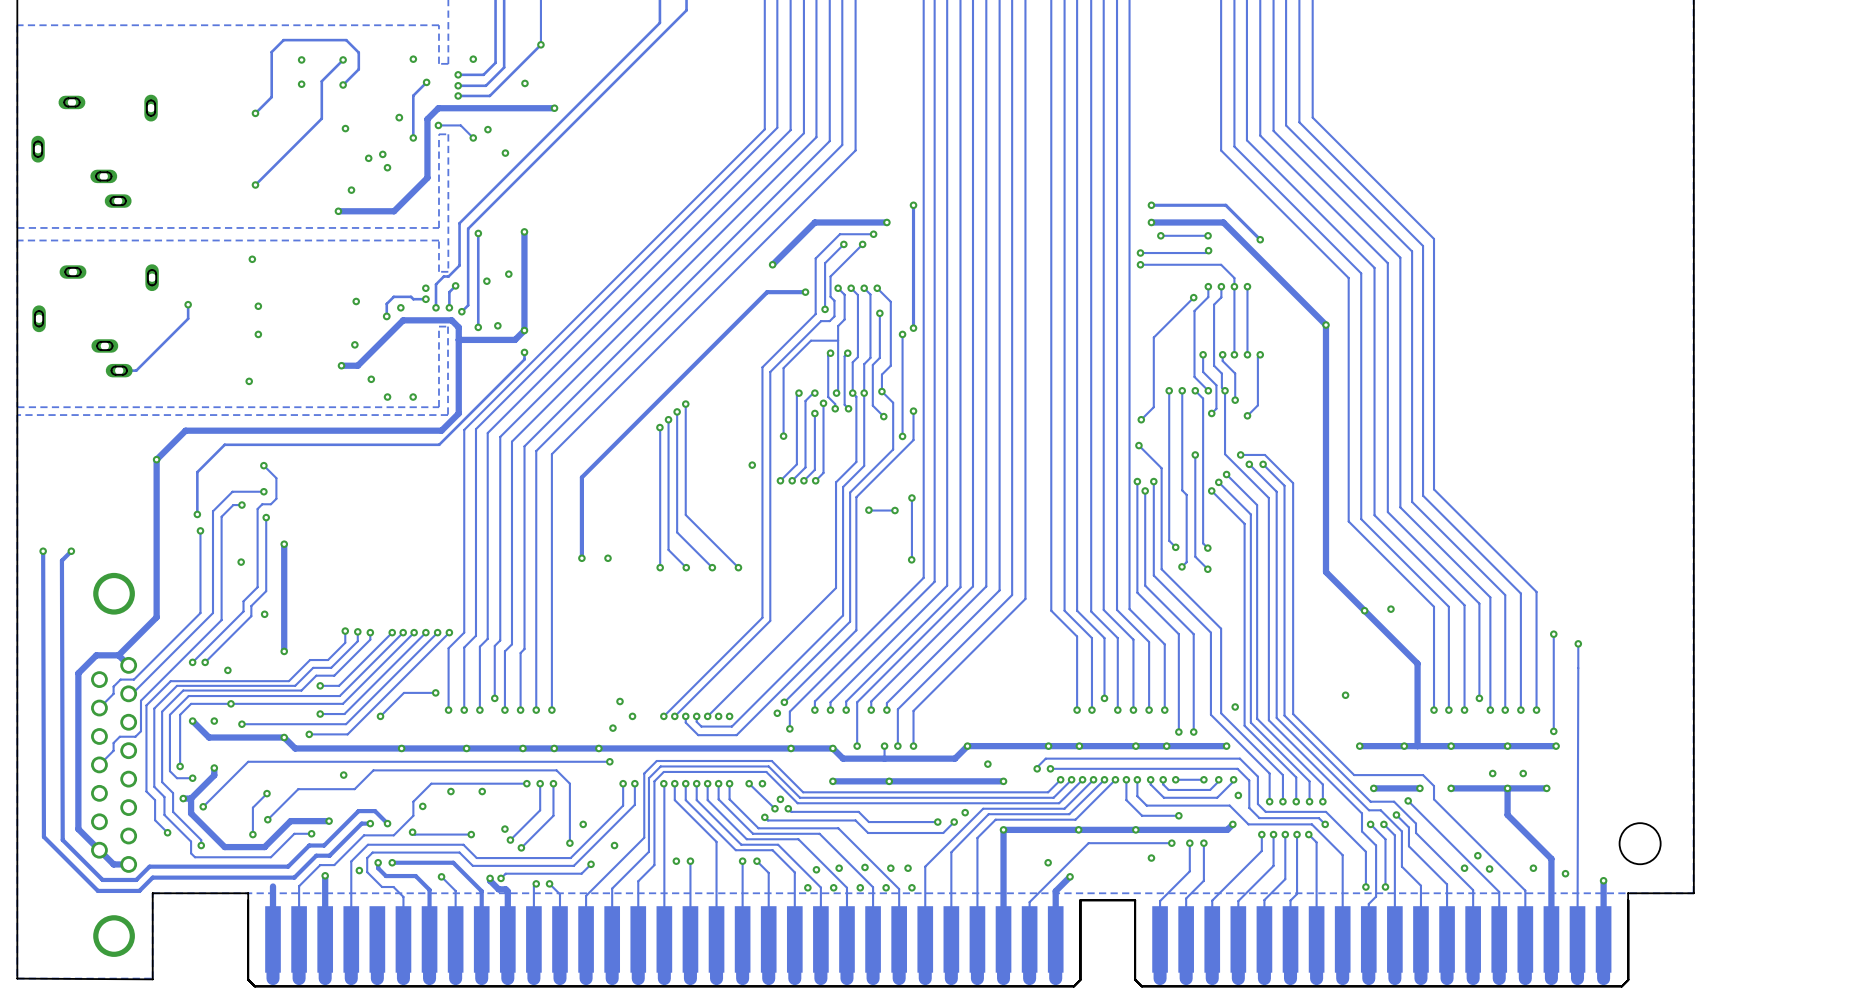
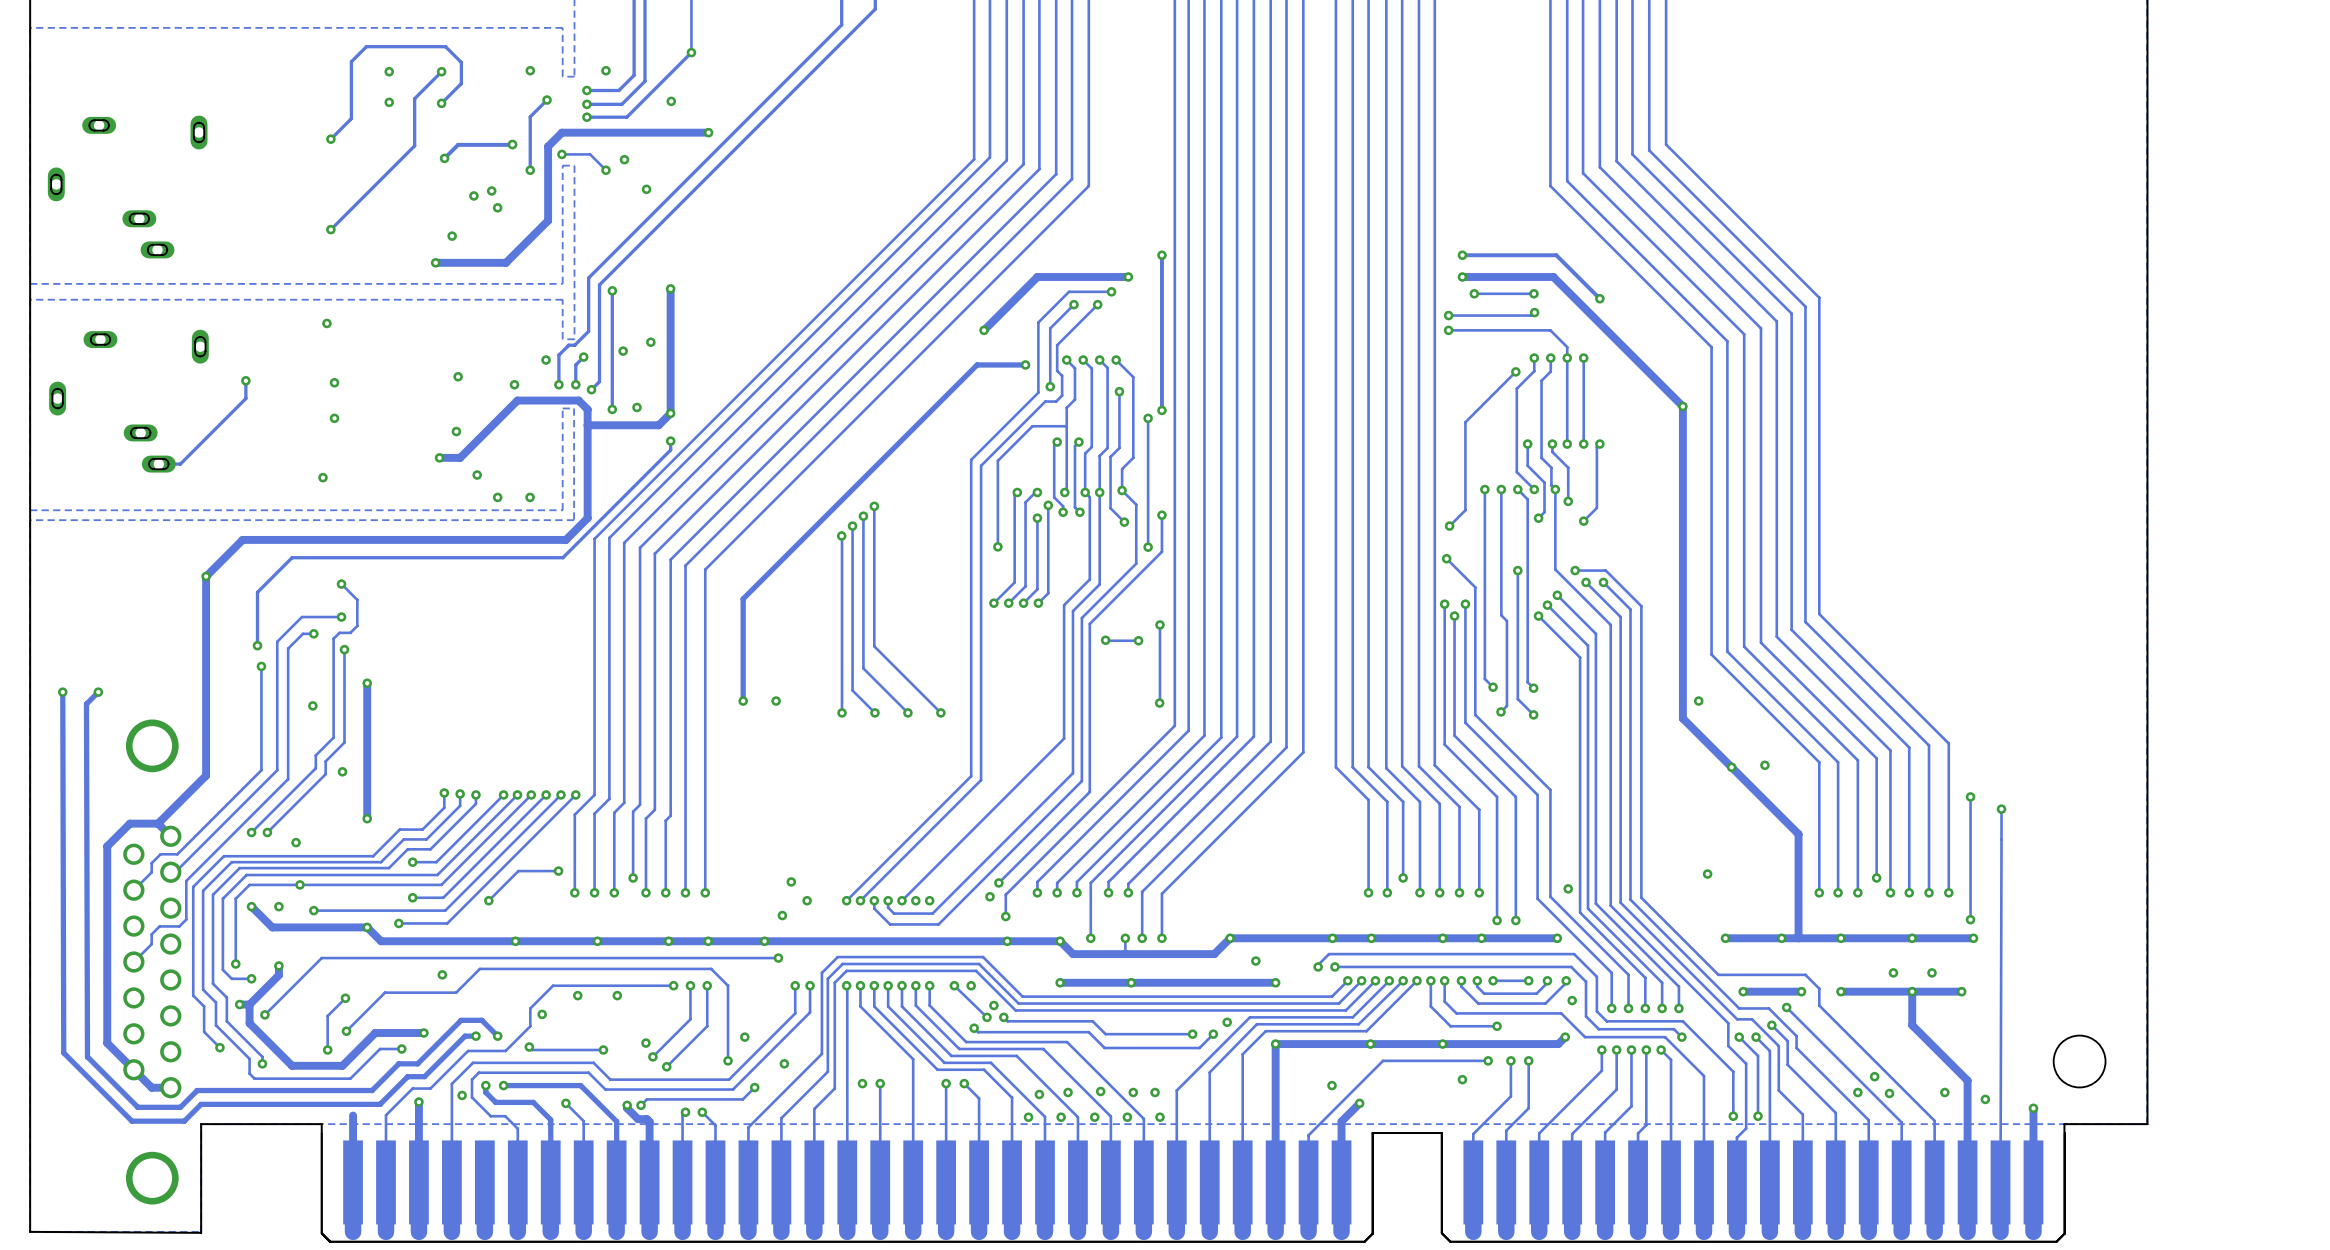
track: none -> (512, 144) (458, 144) (445, 157)
track: (425, 299) (393, 296) (386, 303) (386, 316) -> none
via: (425, 299) -> none
via: (386, 316) -> none
via: (752, 465) -> none
via: none -> (1698, 701)

